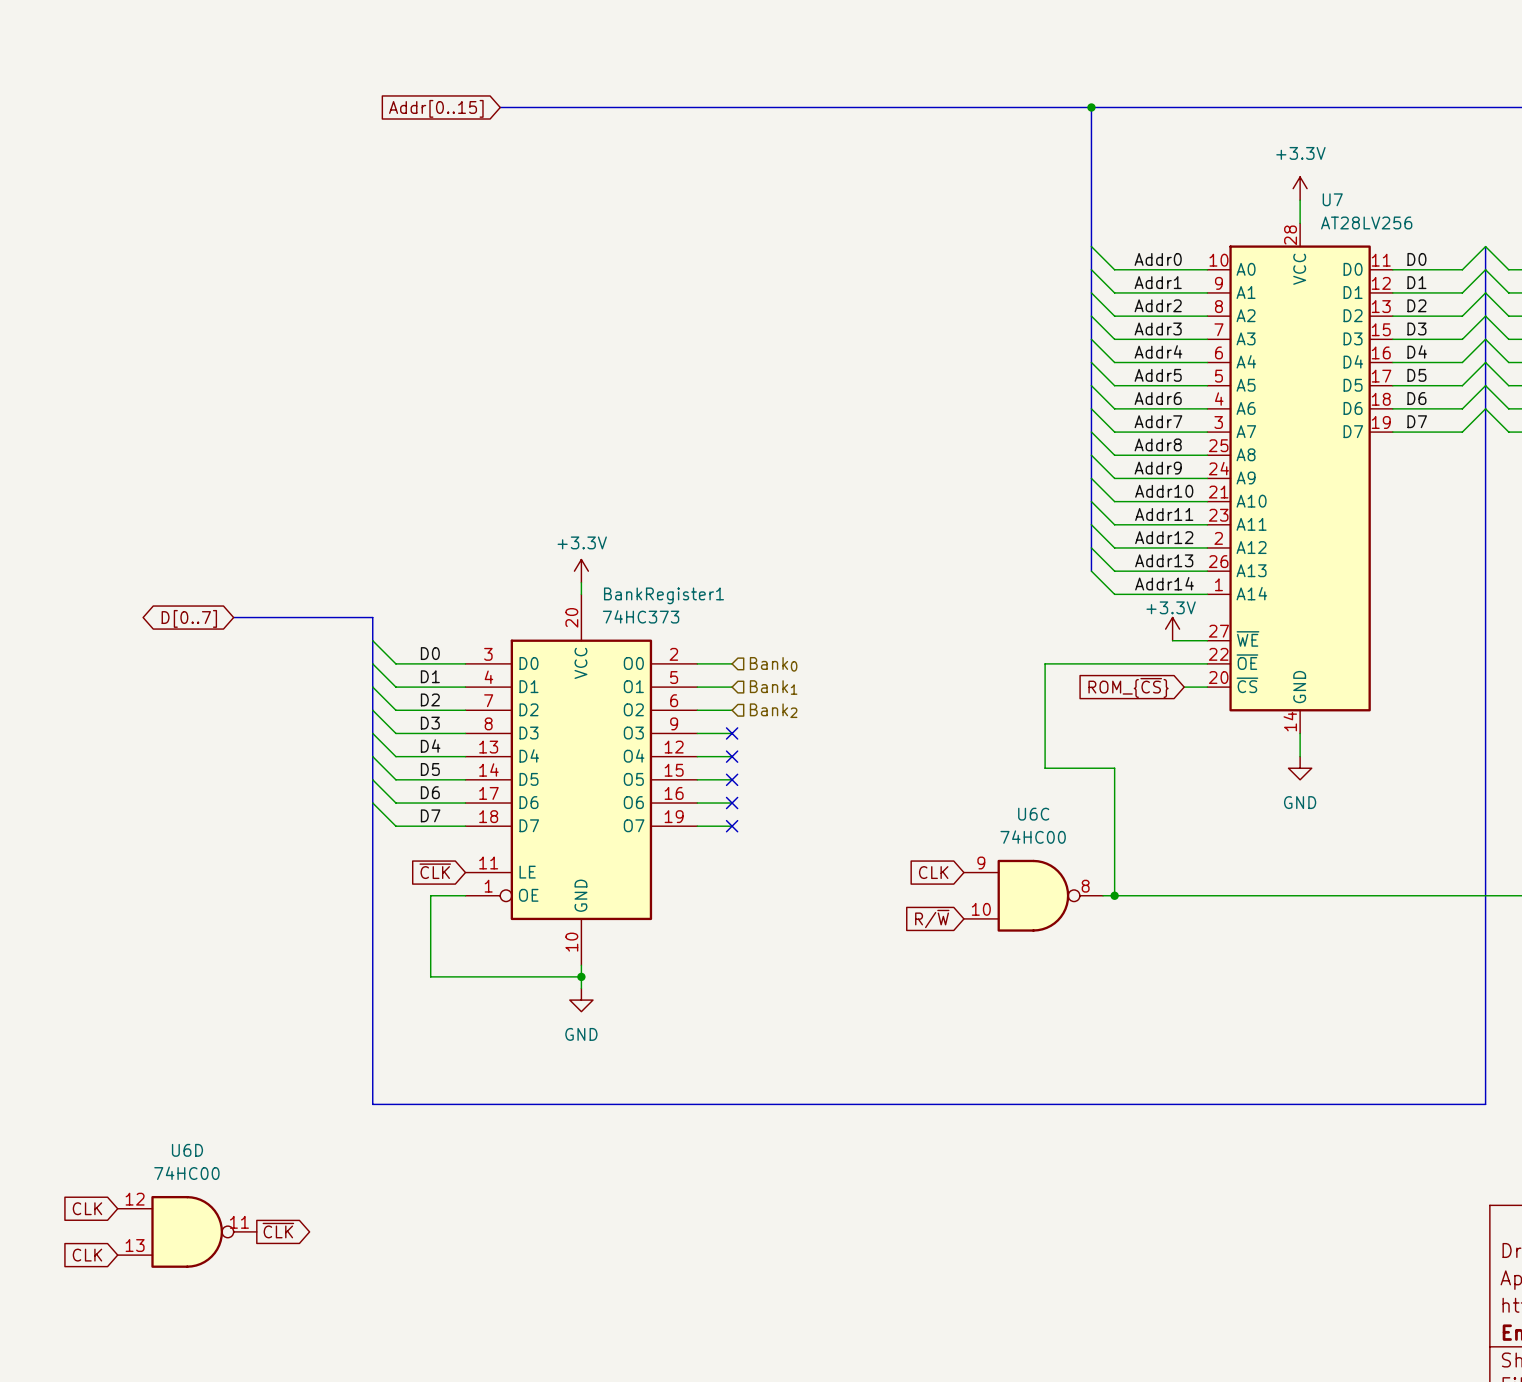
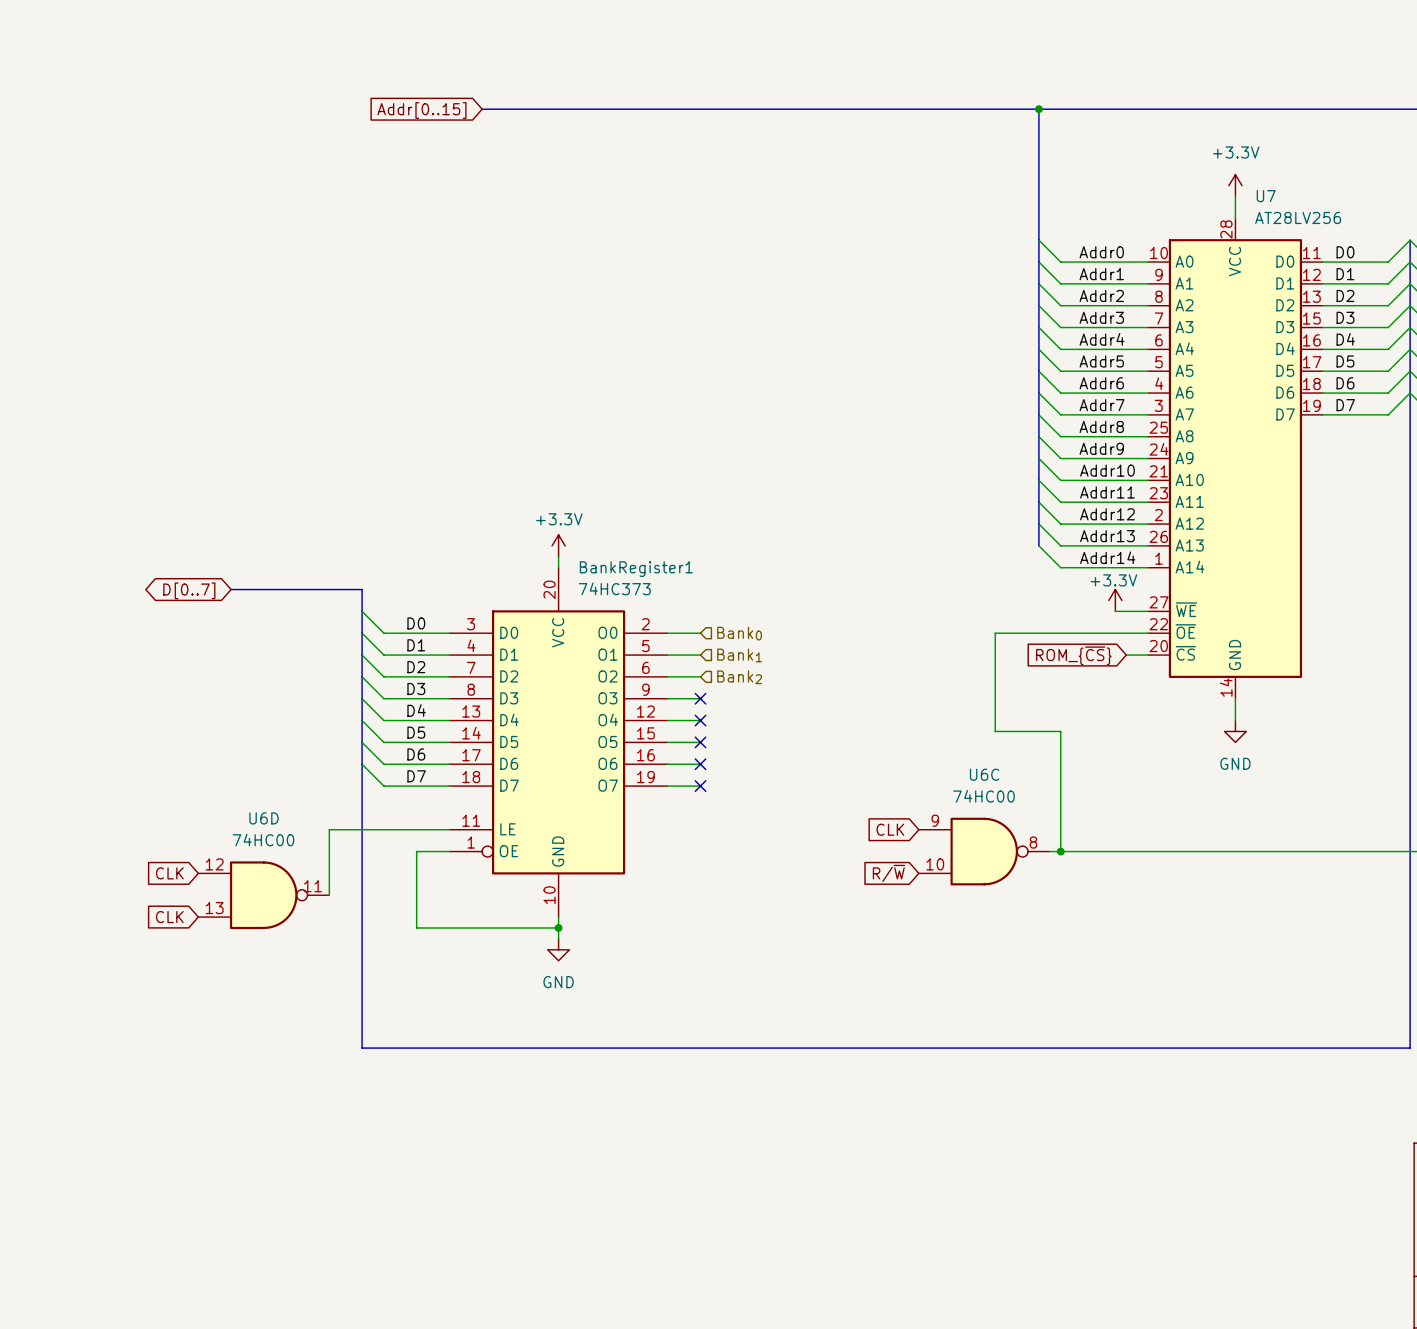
global label: ~{CLK} (435, 871) -> none
wire: none -> (449, 829) (329, 829) (329, 895)
global label: none -> CLK (169, 873)
global label: none -> CLK (169, 917)
global label: CLK (87, 1208) -> none
global label: ~{CLK} (278, 1230) -> none
U6D position: (187, 1231) -> (263, 895)
global label: CLK (87, 1255) -> none

